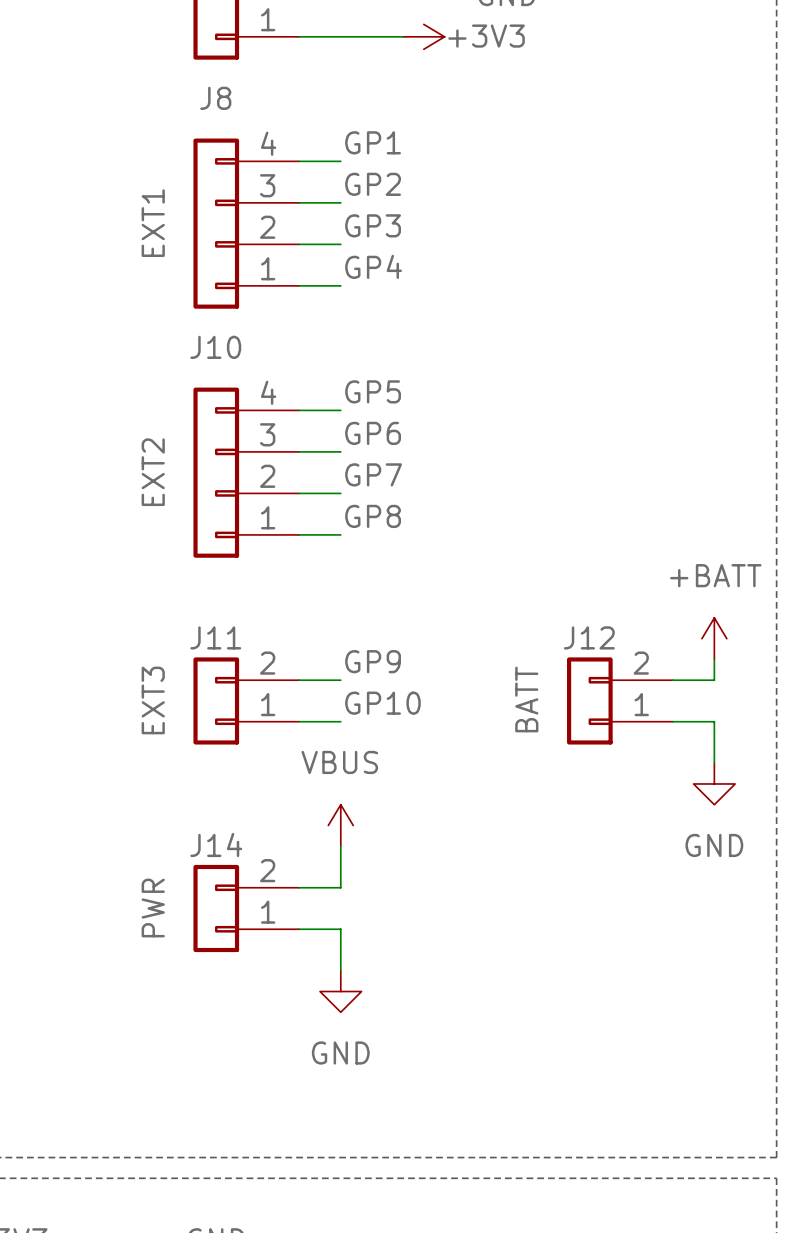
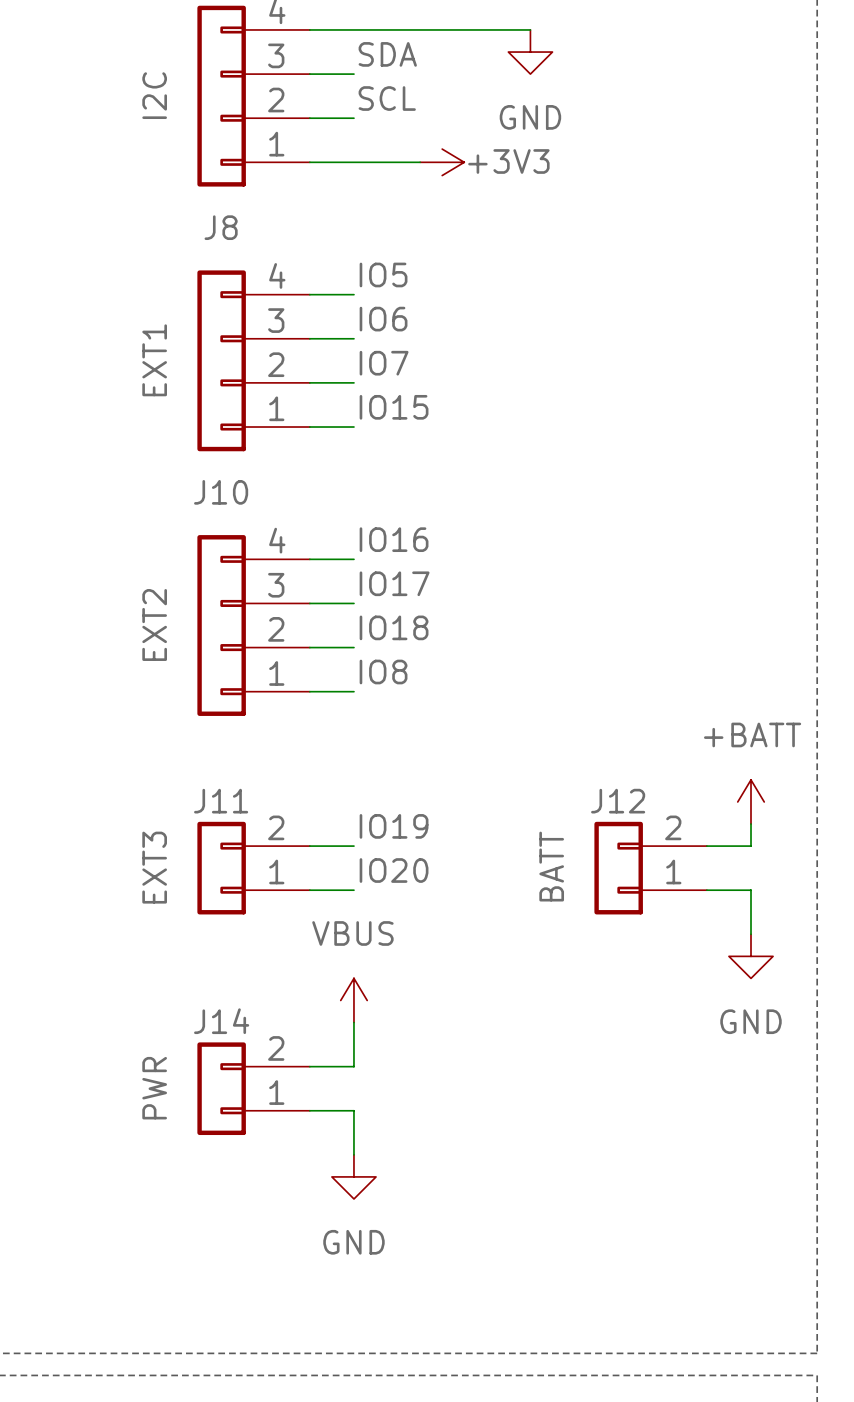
label: GP1 (373, 142) -> IO5 (383, 274)
label: GP2 (373, 184) -> IO6 (383, 319)
label: GP3 (373, 225) -> IO7 (384, 363)
label: GP4 (373, 266) -> IO15 (394, 407)
label: GP5 (373, 391) -> IO16 (394, 539)
label: GP6 (373, 433) -> IO17 (394, 583)
label: GP7 (373, 474) -> IO18 (394, 627)
label: GP8 (373, 516) -> IO8 (383, 672)
label: GP9 (373, 661) -> IO19 (394, 826)
label: GP10 (382, 703) -> IO20 (394, 870)

